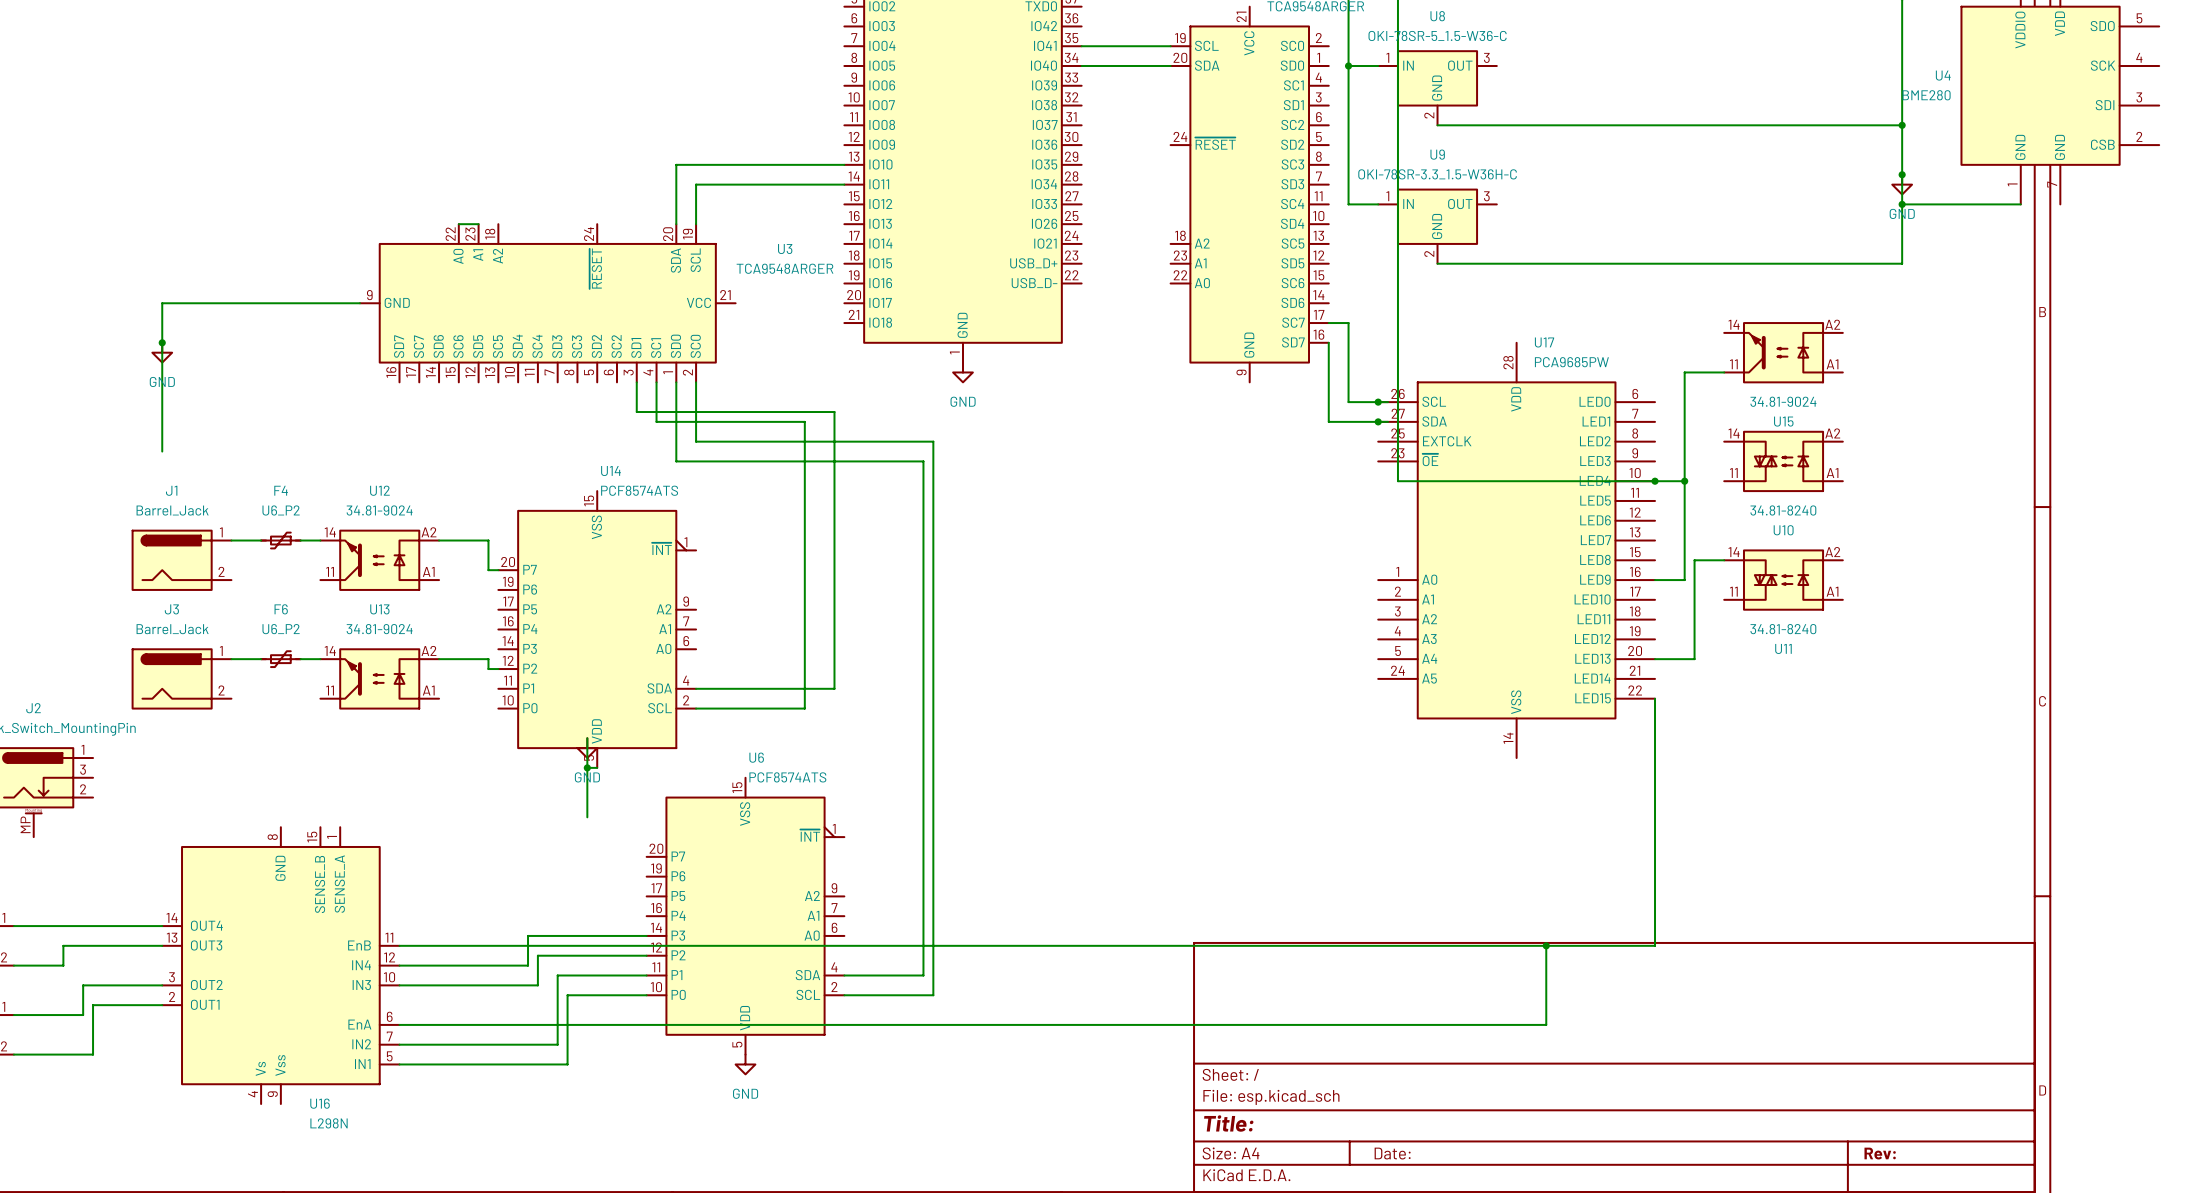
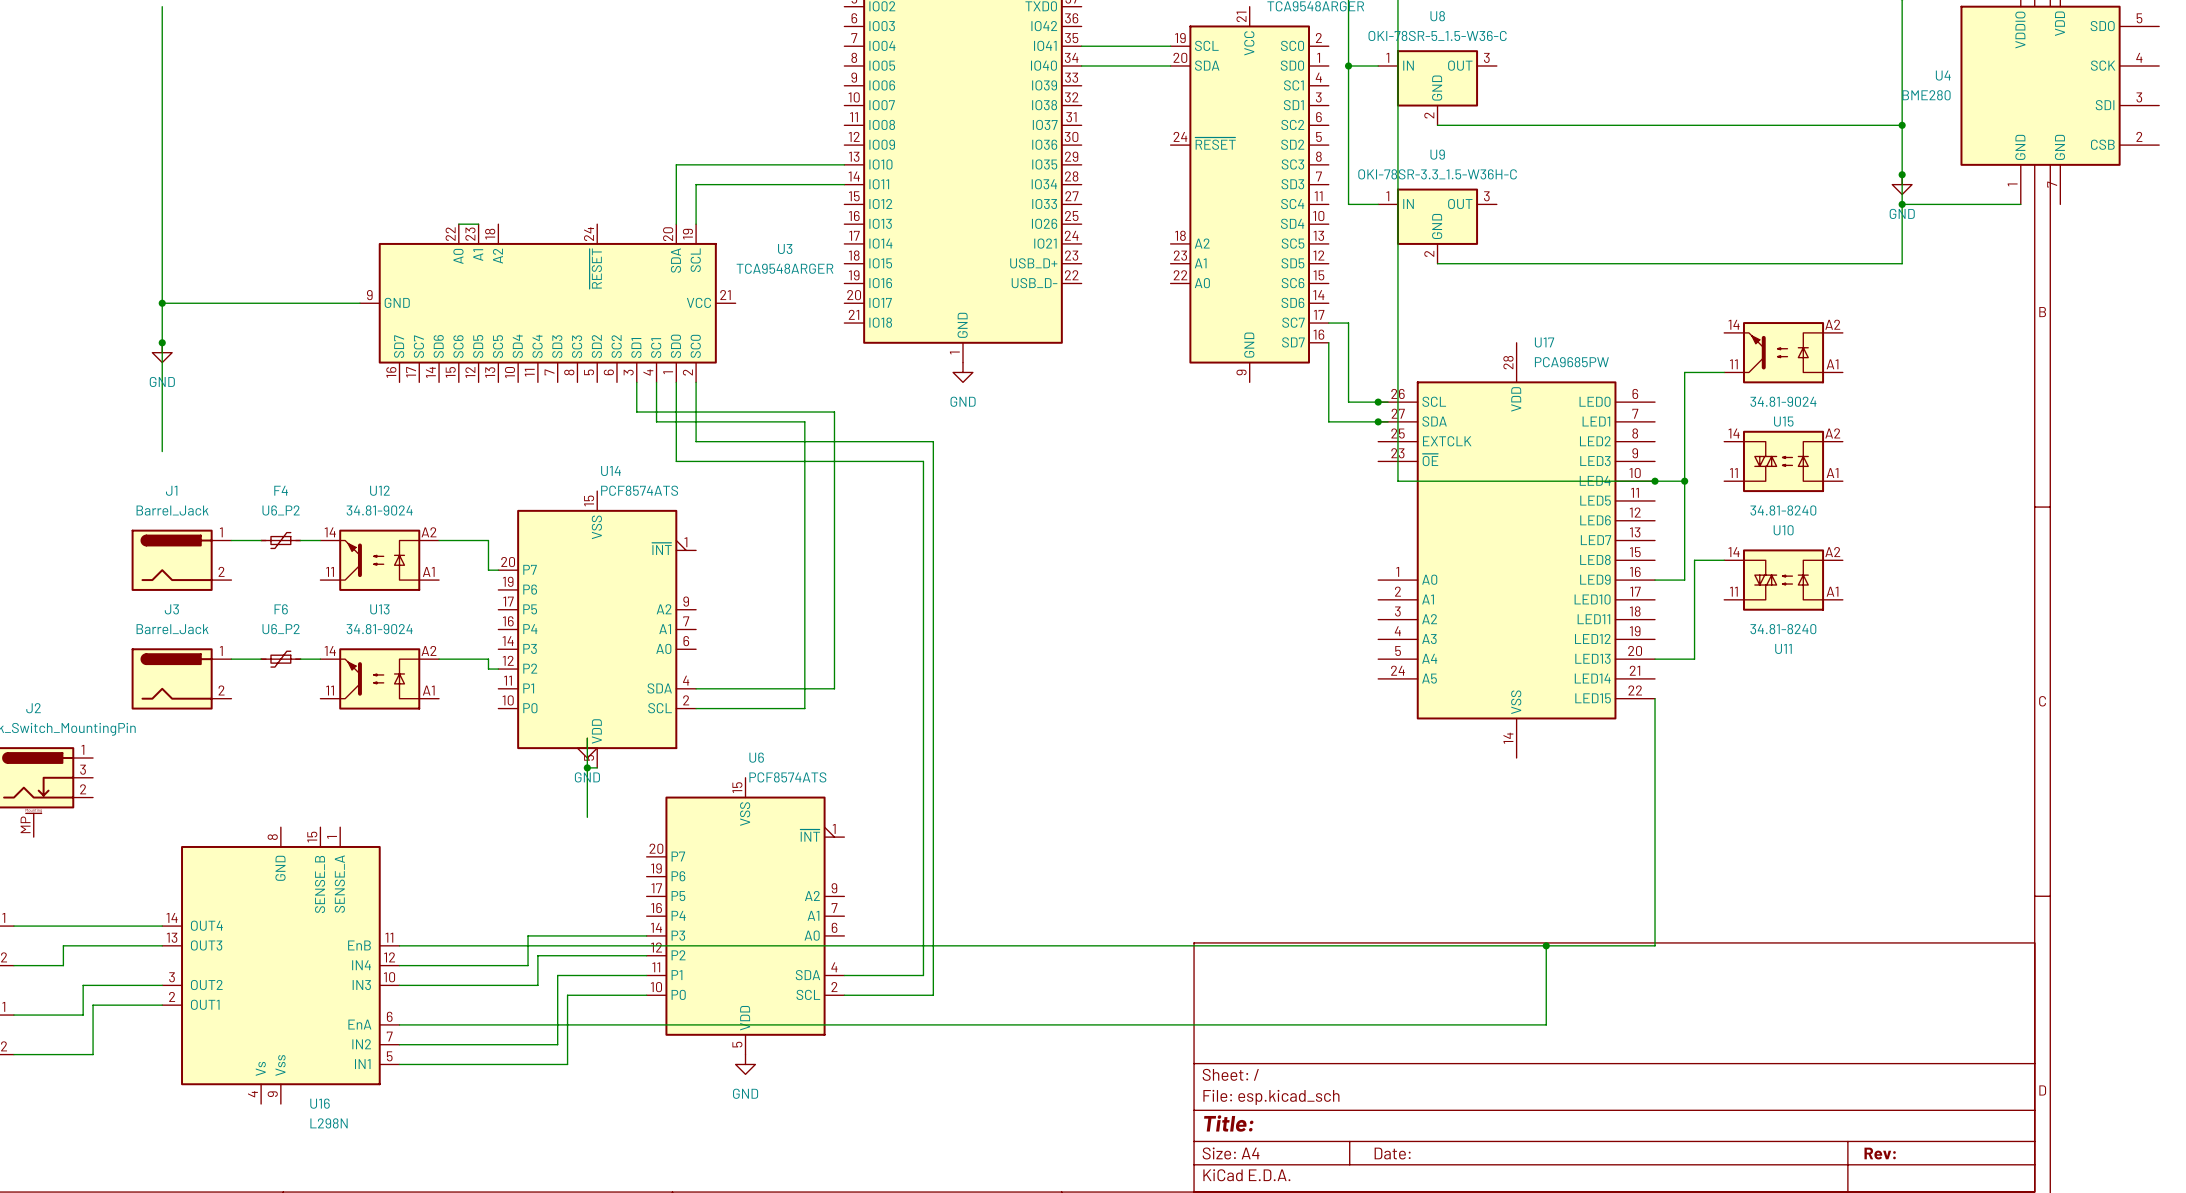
wire: none -> (162, 6) (162, 303)
junction: none -> (162, 303)

